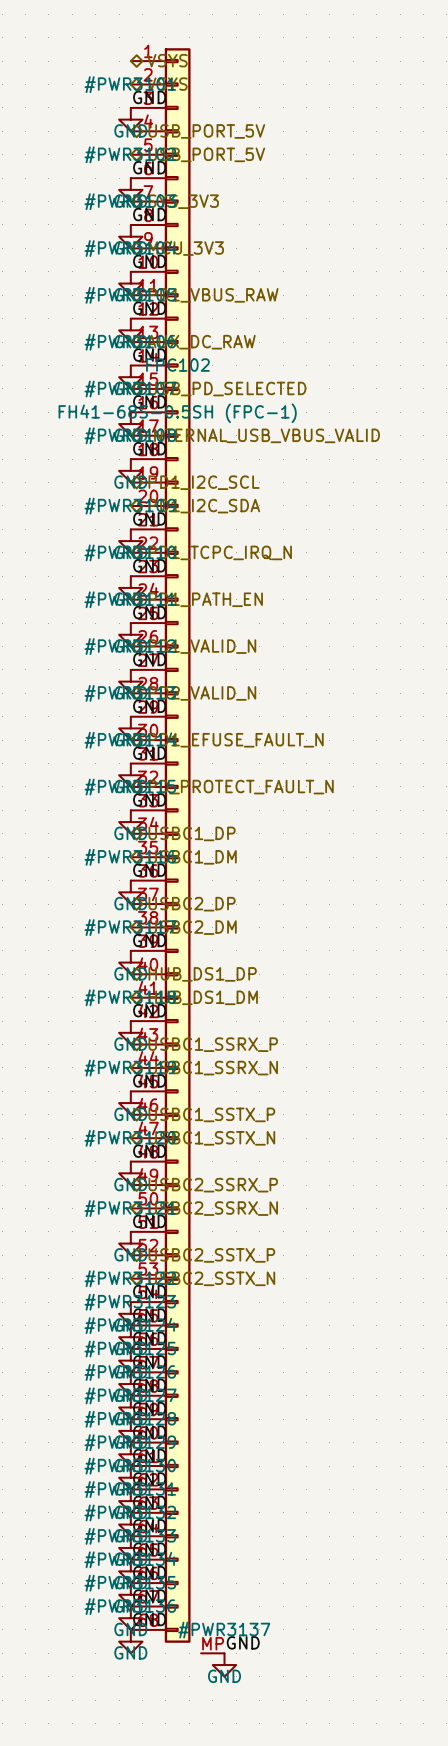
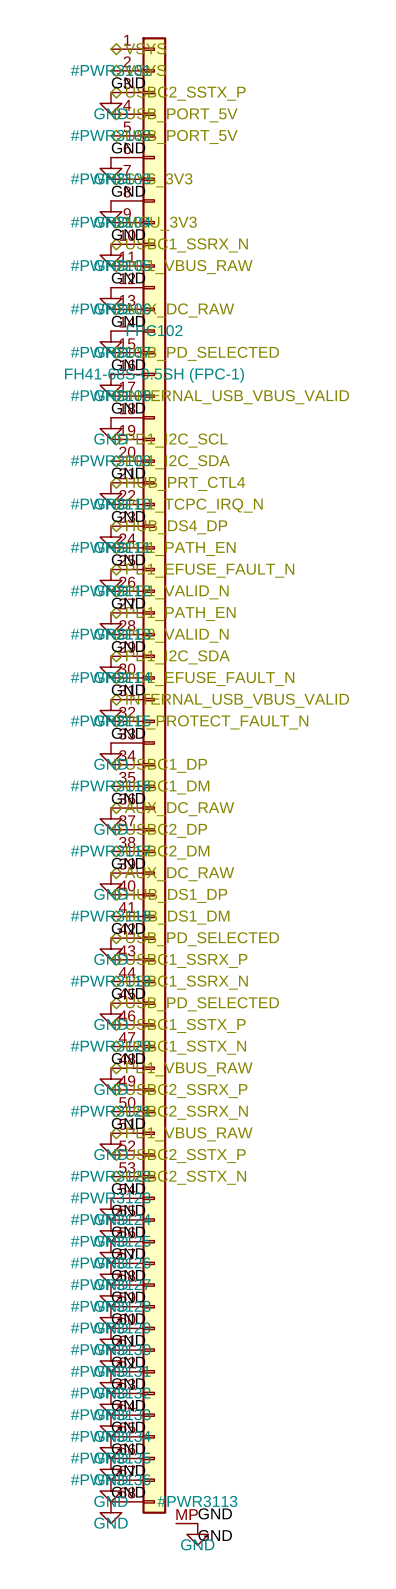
hierarchical label: none -> USBC2_SSTX_P (185, 93)
hierarchical label: none -> USBC1_SSRX_N (186, 245)
hierarchical label: none -> HUB_PRT_CTL4 (185, 483)
hierarchical label: none -> HUB_DS4_DP (176, 527)
hierarchical label: none -> PD1_EFUSE_FAULT_N (210, 570)
hierarchical label: none -> PD1_PATH_EN (180, 614)
hierarchical label: none -> PD1_I2C_SDA (177, 657)
hierarchical label: none -> INTERNAL_USB_VBUS_VALID (237, 700)
hierarchical label: none -> AUX_DC_RAW (179, 809)
hierarchical label: none -> AUX_DC_RAW (179, 874)
hierarchical label: none -> USB_PD_SELECTED (202, 939)
hierarchical label: none -> USB_PD_SELECTED (202, 1004)
hierarchical label: none -> PD1_VBUS_RAW (189, 1069)
hierarchical label: none -> PD1_VBUS_RAW (189, 1134)
#PWR3137 name: #PWR3137 (224, 1630) -> #PWR3113 (197, 1501)
label: none -> GND (215, 1535)

